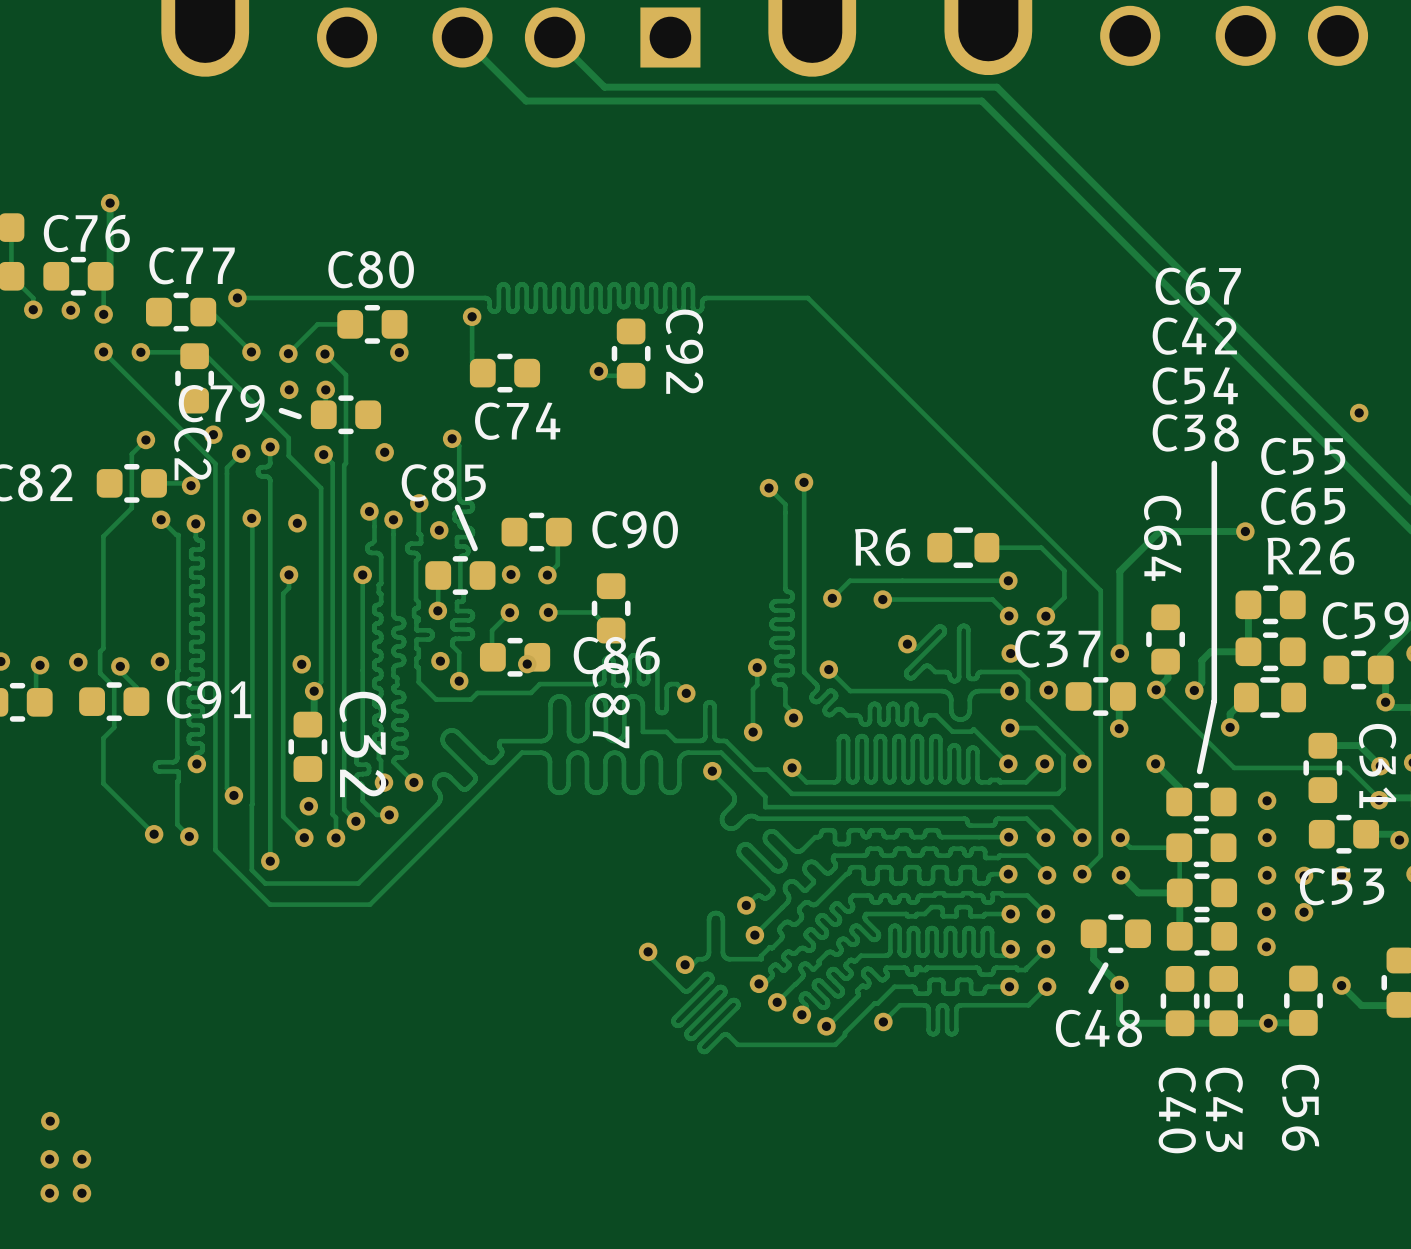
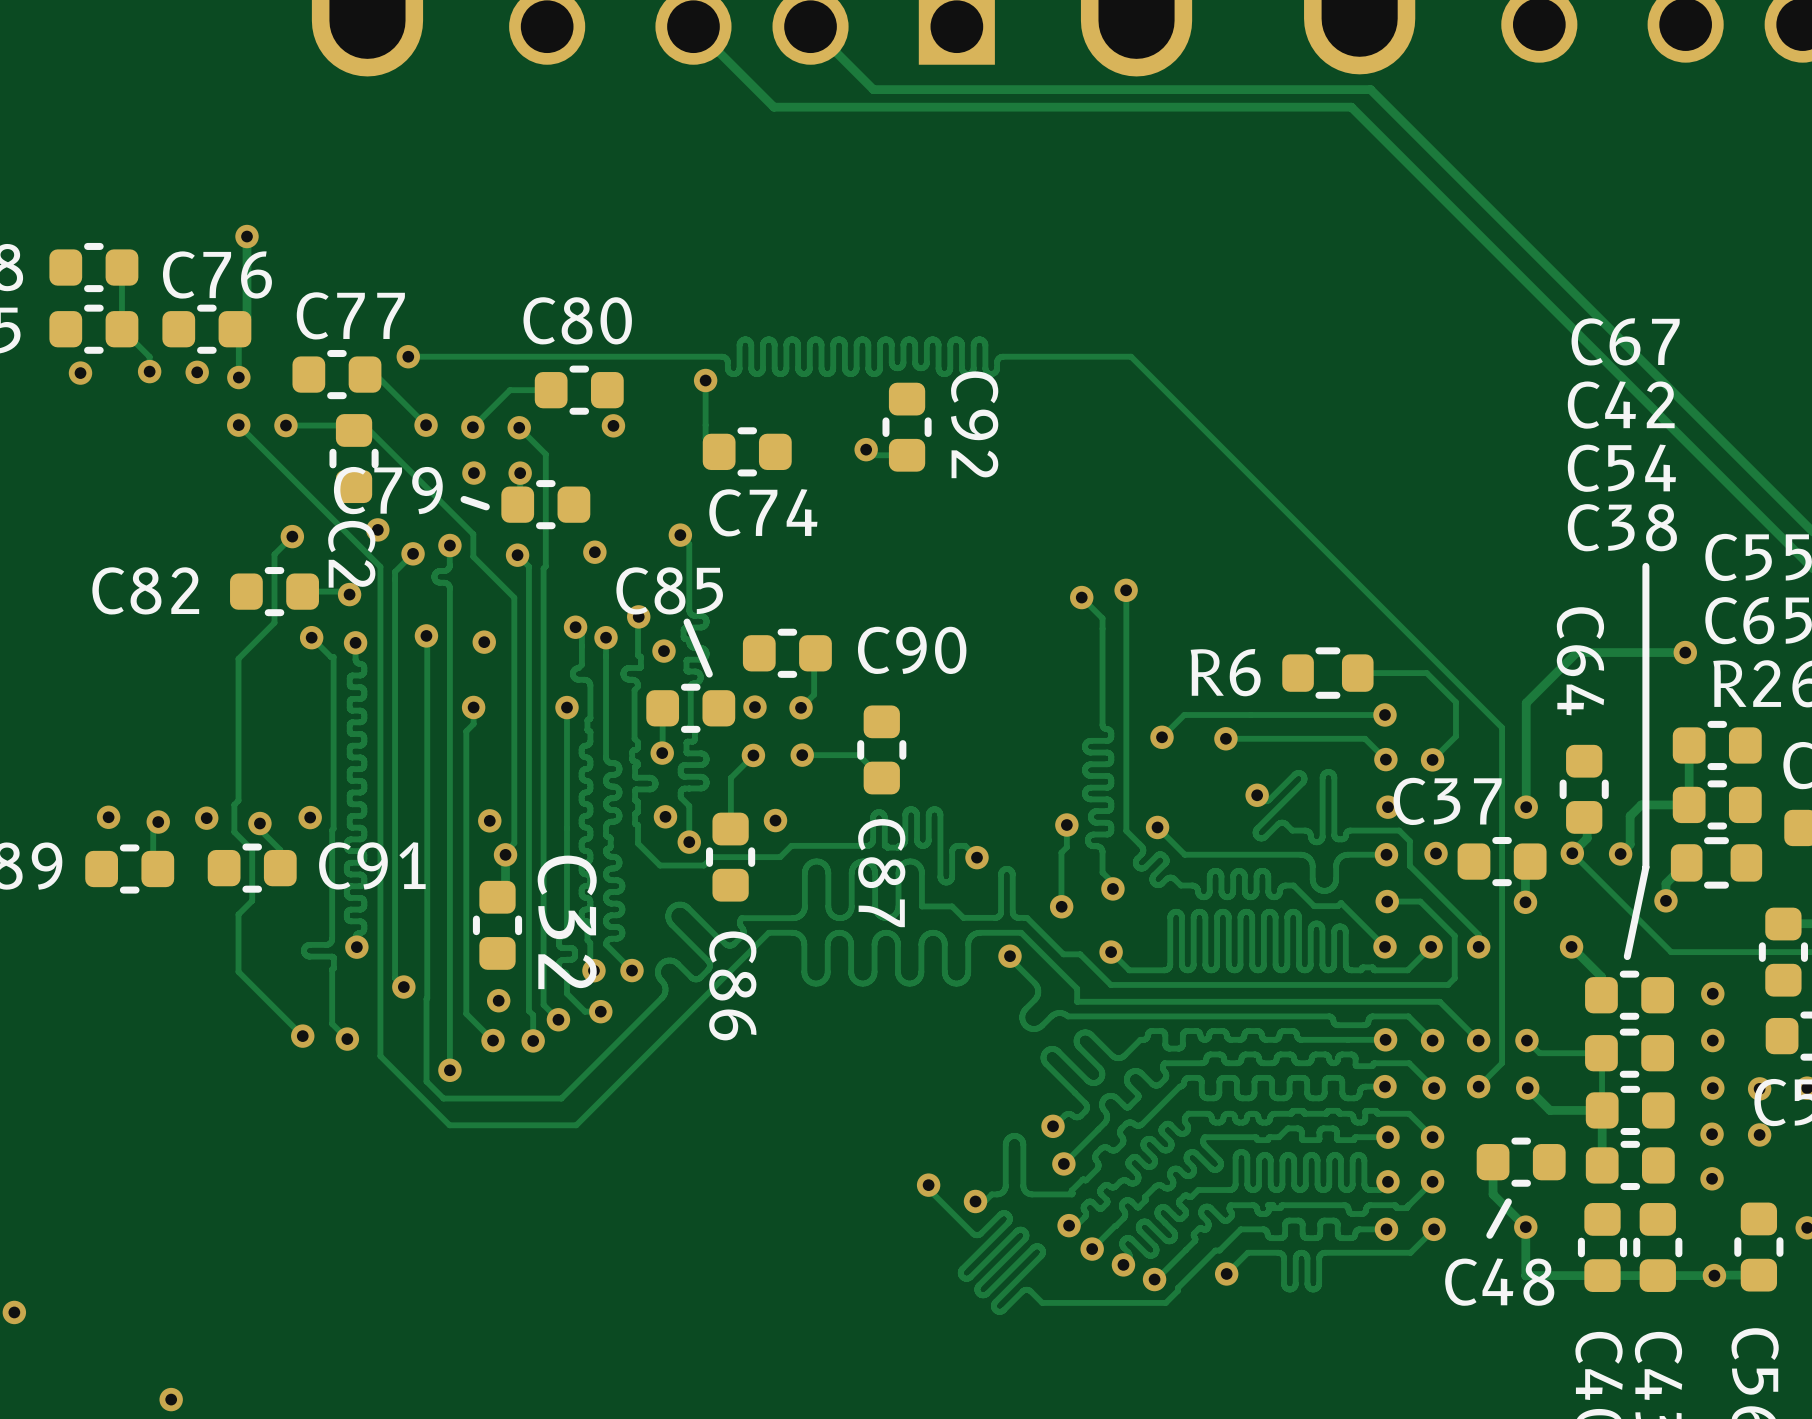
C86 rotation: 0° (515, 657) -> 90° clockwise (730, 857)
C86 position: (515, 657) -> (730, 857)

